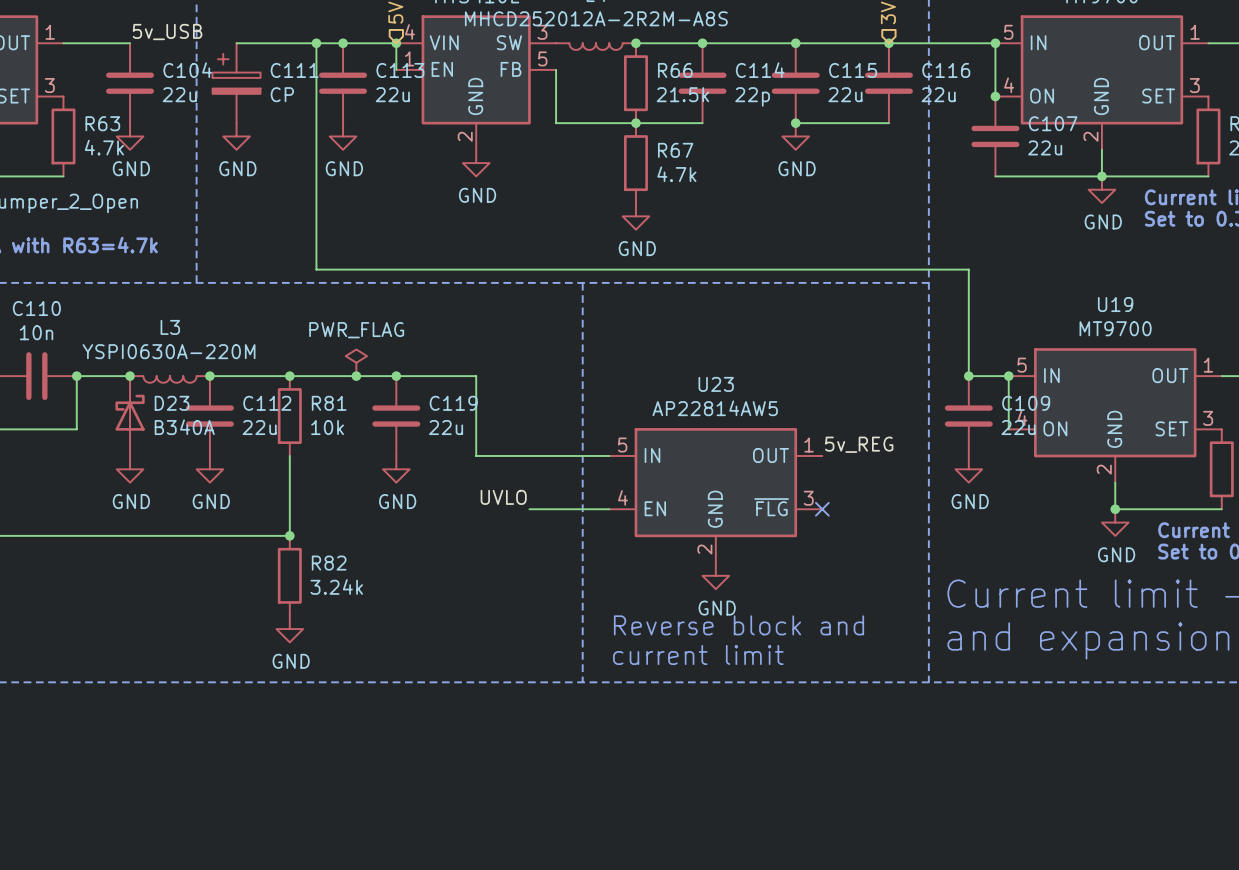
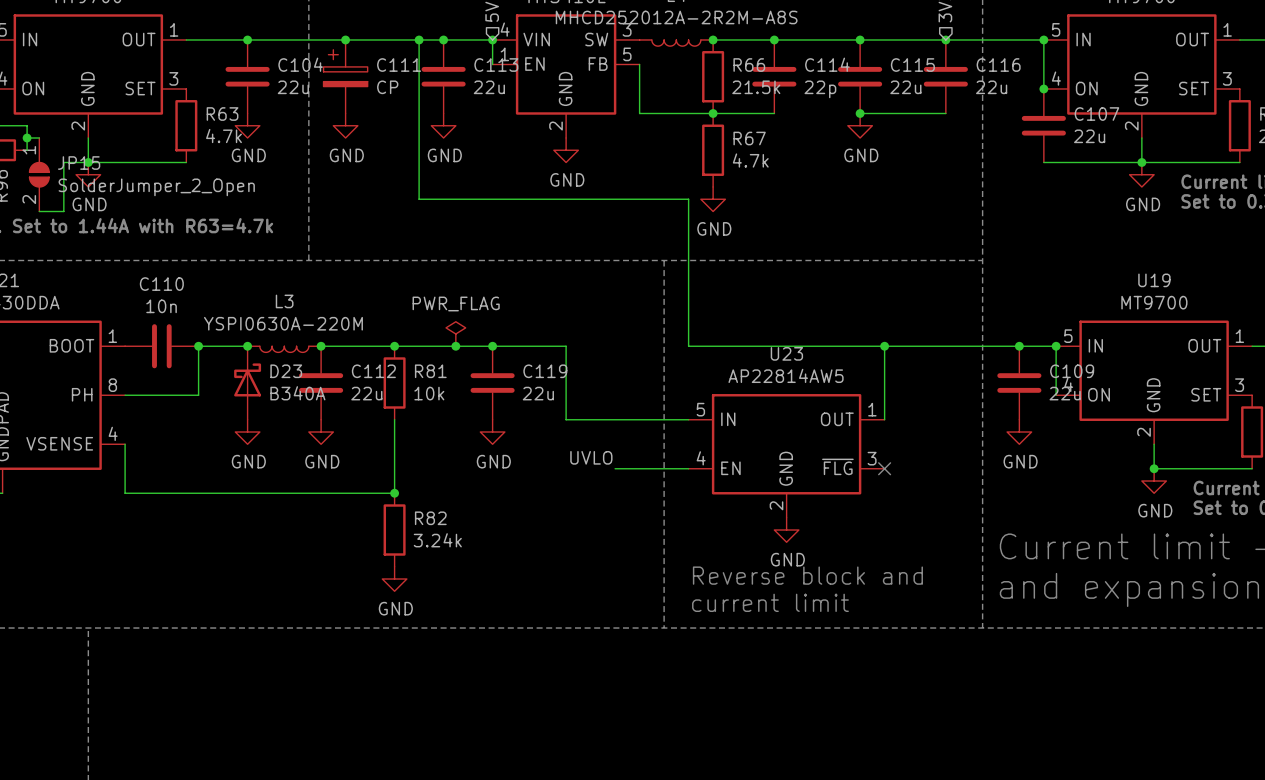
label: 5v_USB (167, 32) -> none
wire: none -> (247, 39) (345, 39)
junction: none -> (247, 39)
junction: none -> (345, 39)
wire: (316, 216) (316, 269) (968, 269) (968, 376) -> (419, 199) (688, 199) (688, 346) (1019, 346)
wire: none -> (884, 346) (884, 419)
junction: none -> (884, 346)
label: 5v_REG (859, 444) -> none

